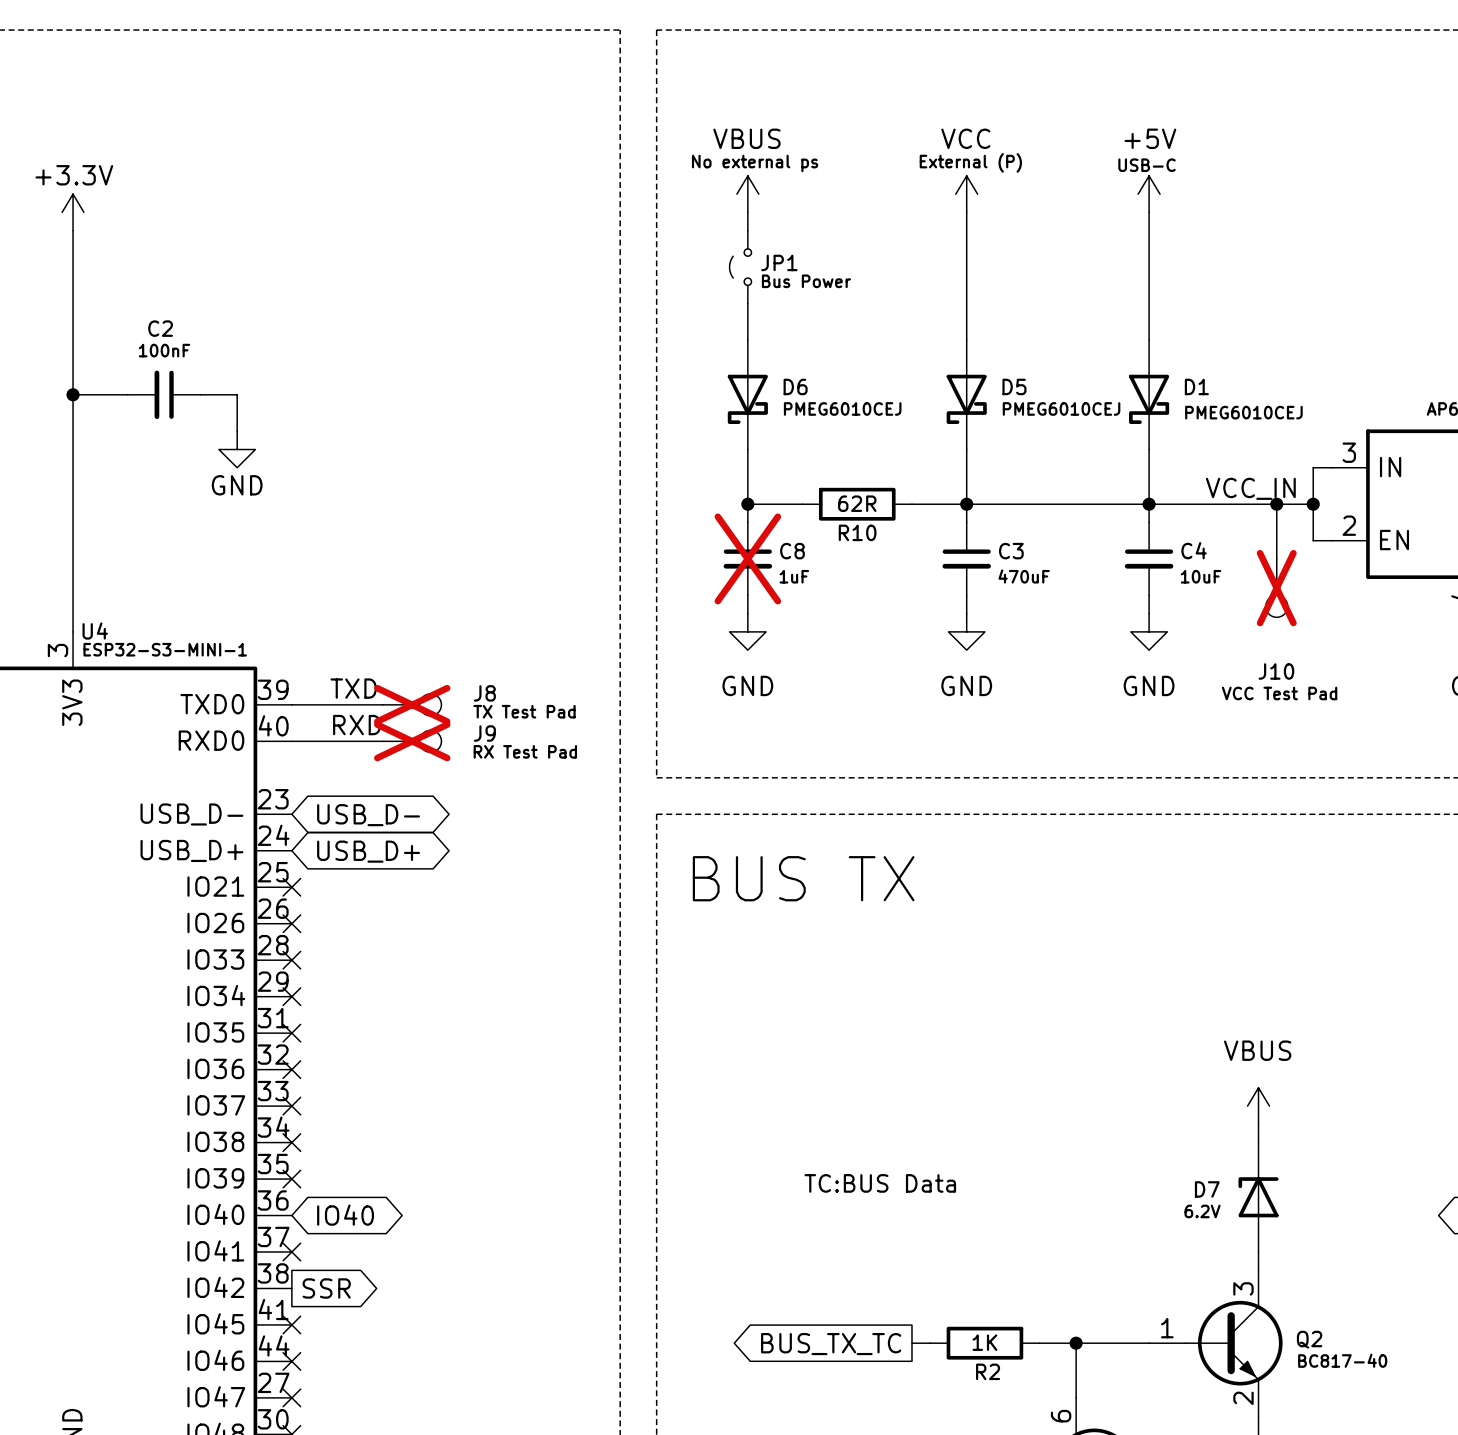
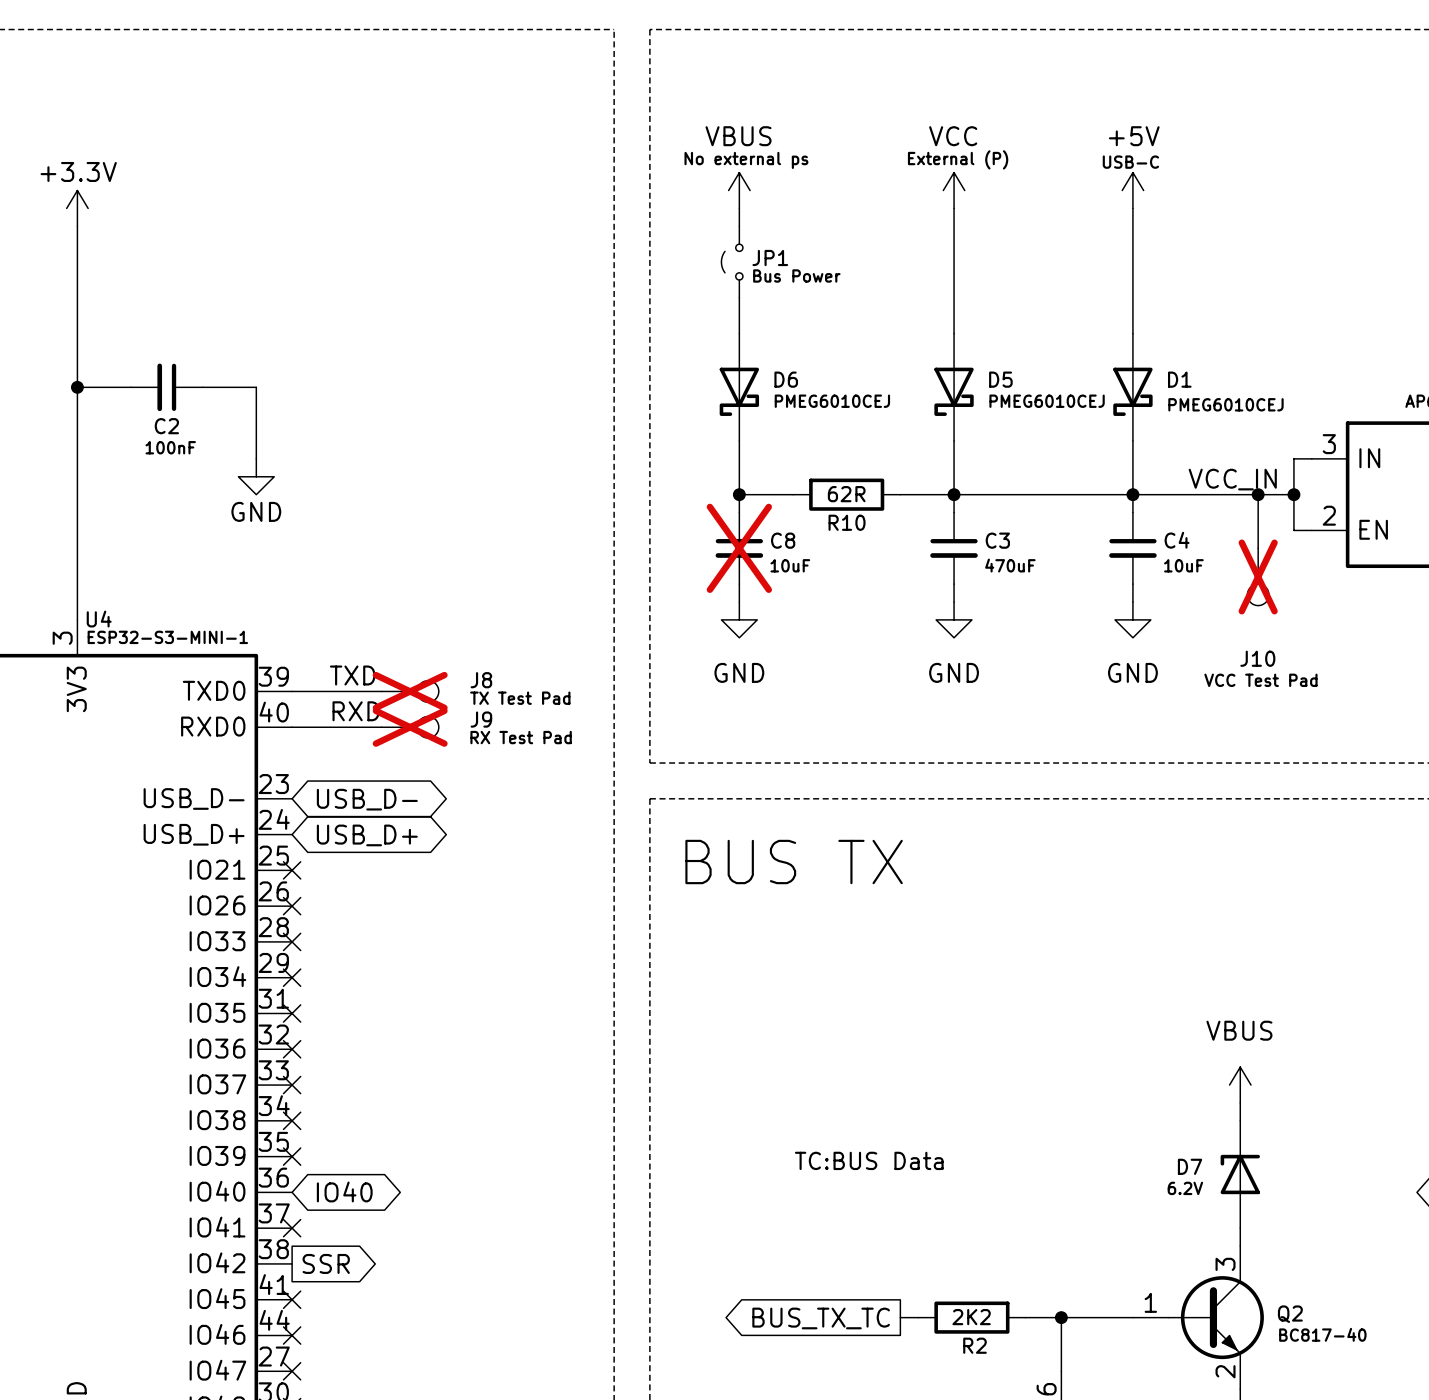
C2 name position: C2 (160, 328) -> C2 (166, 426)
C2 value position: 100nF (164, 350) -> 100nF (170, 447)
wire: (237, 394) (237, 431) -> (238, 387) (256, 387) (256, 458)
power symbol position: GND (237, 449) -> GND (256, 476)
C8 value: 1uF (794, 576) -> 10uF (790, 565)
R2 value: 1K (984, 1342) -> 2K2 (971, 1317)

